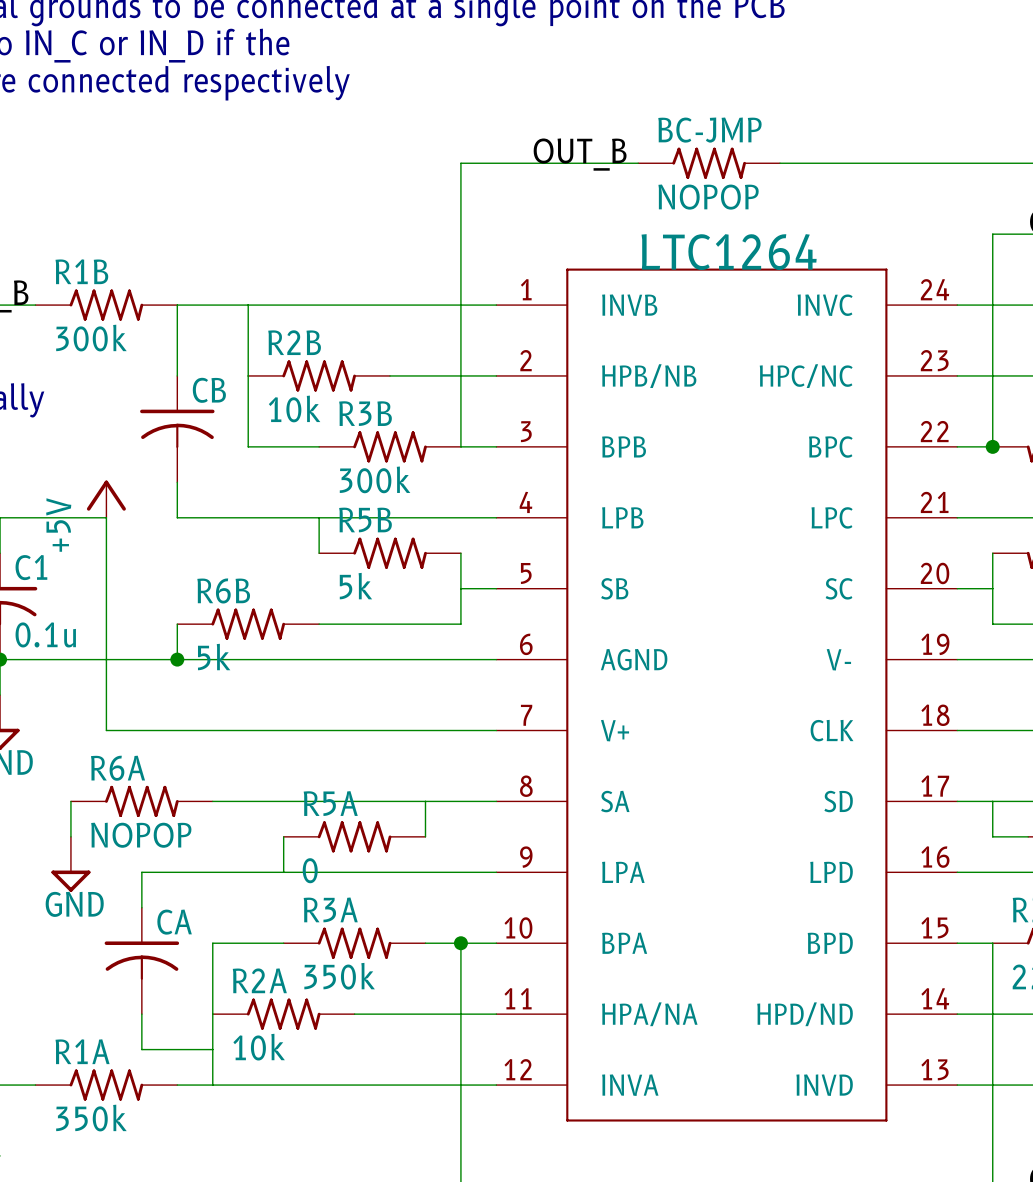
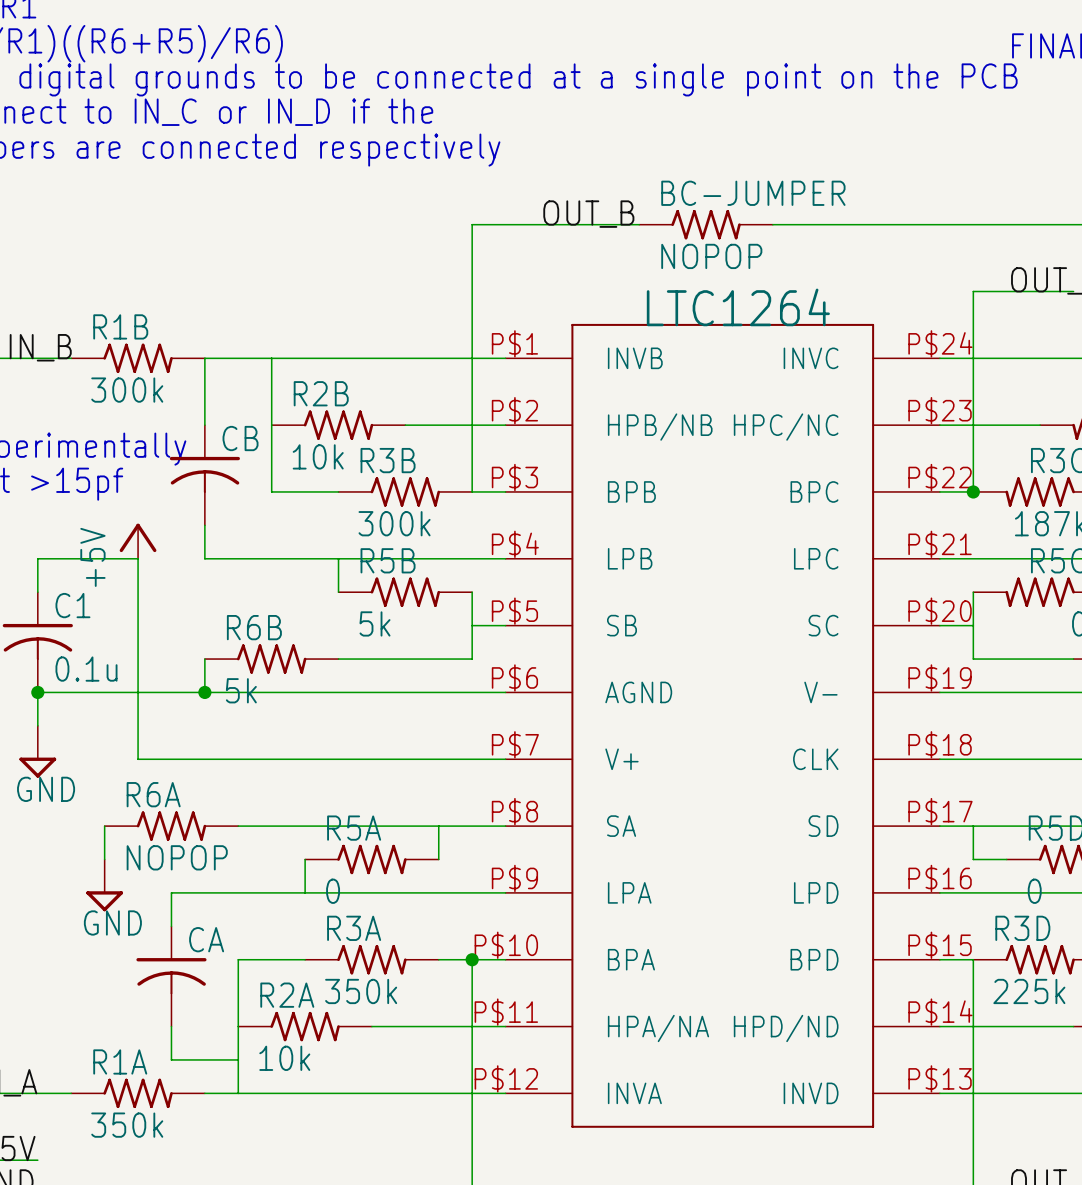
BC-JMP name: BC-JMP (709, 130) -> BC-JUMPER (753, 193)
part symbol: [496, 268, 958, 1122] -> [505, 323, 940, 1128]

